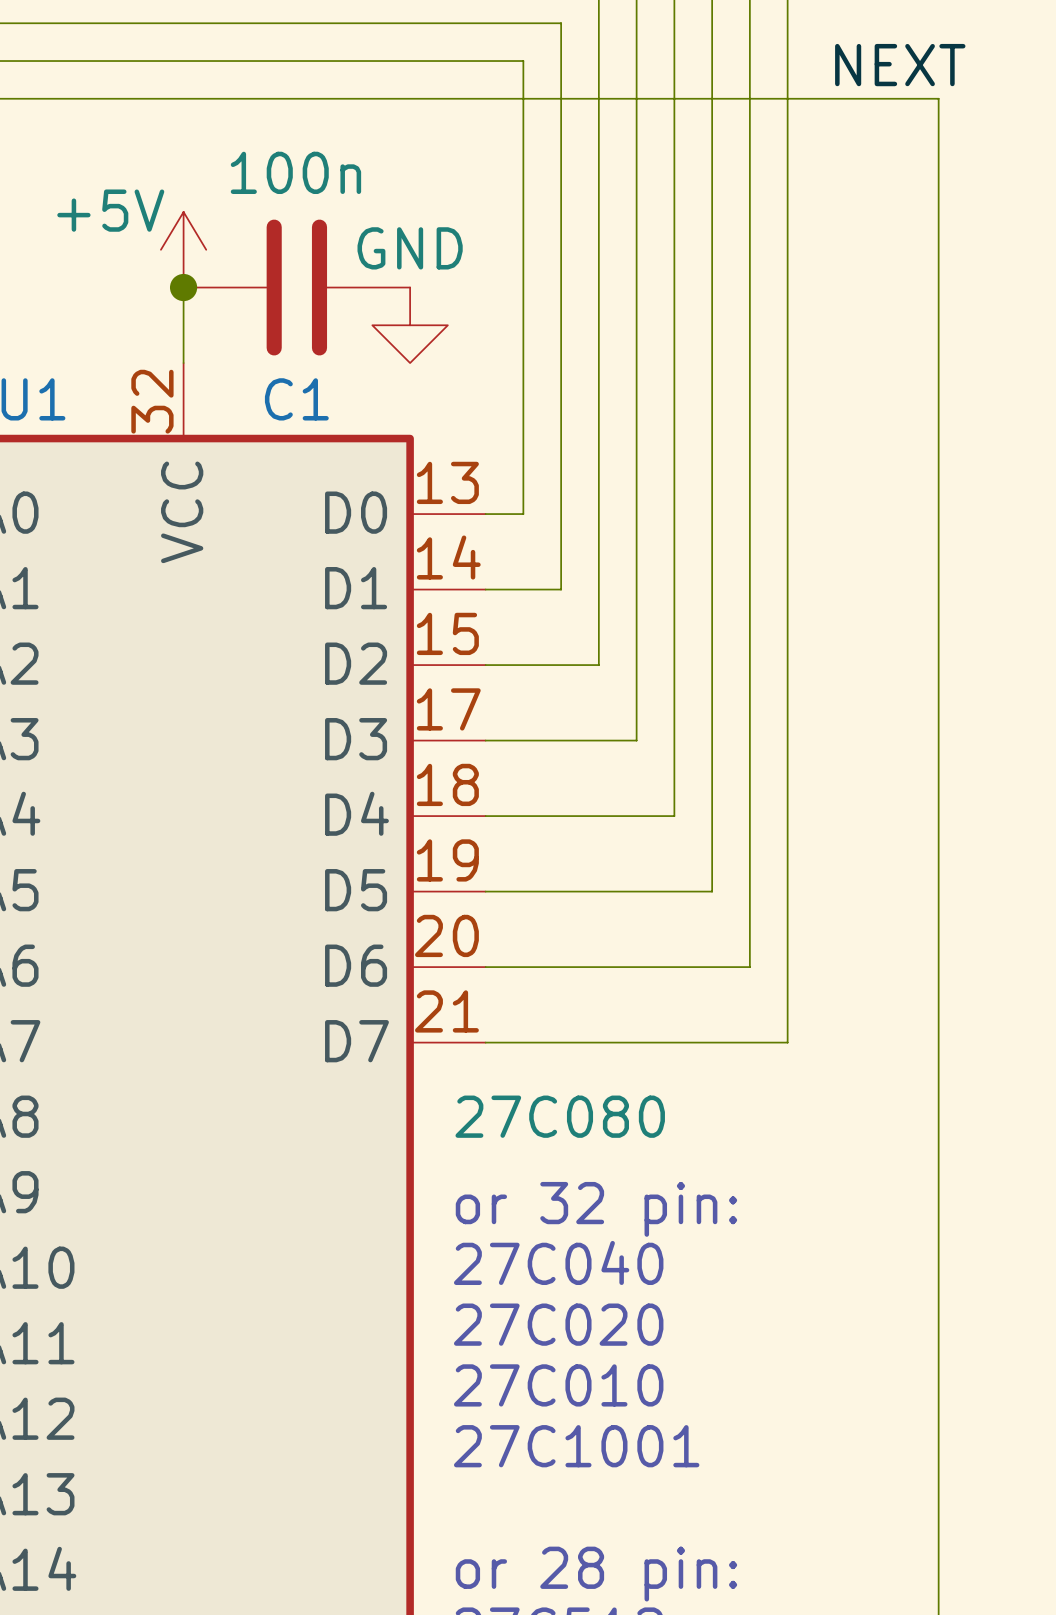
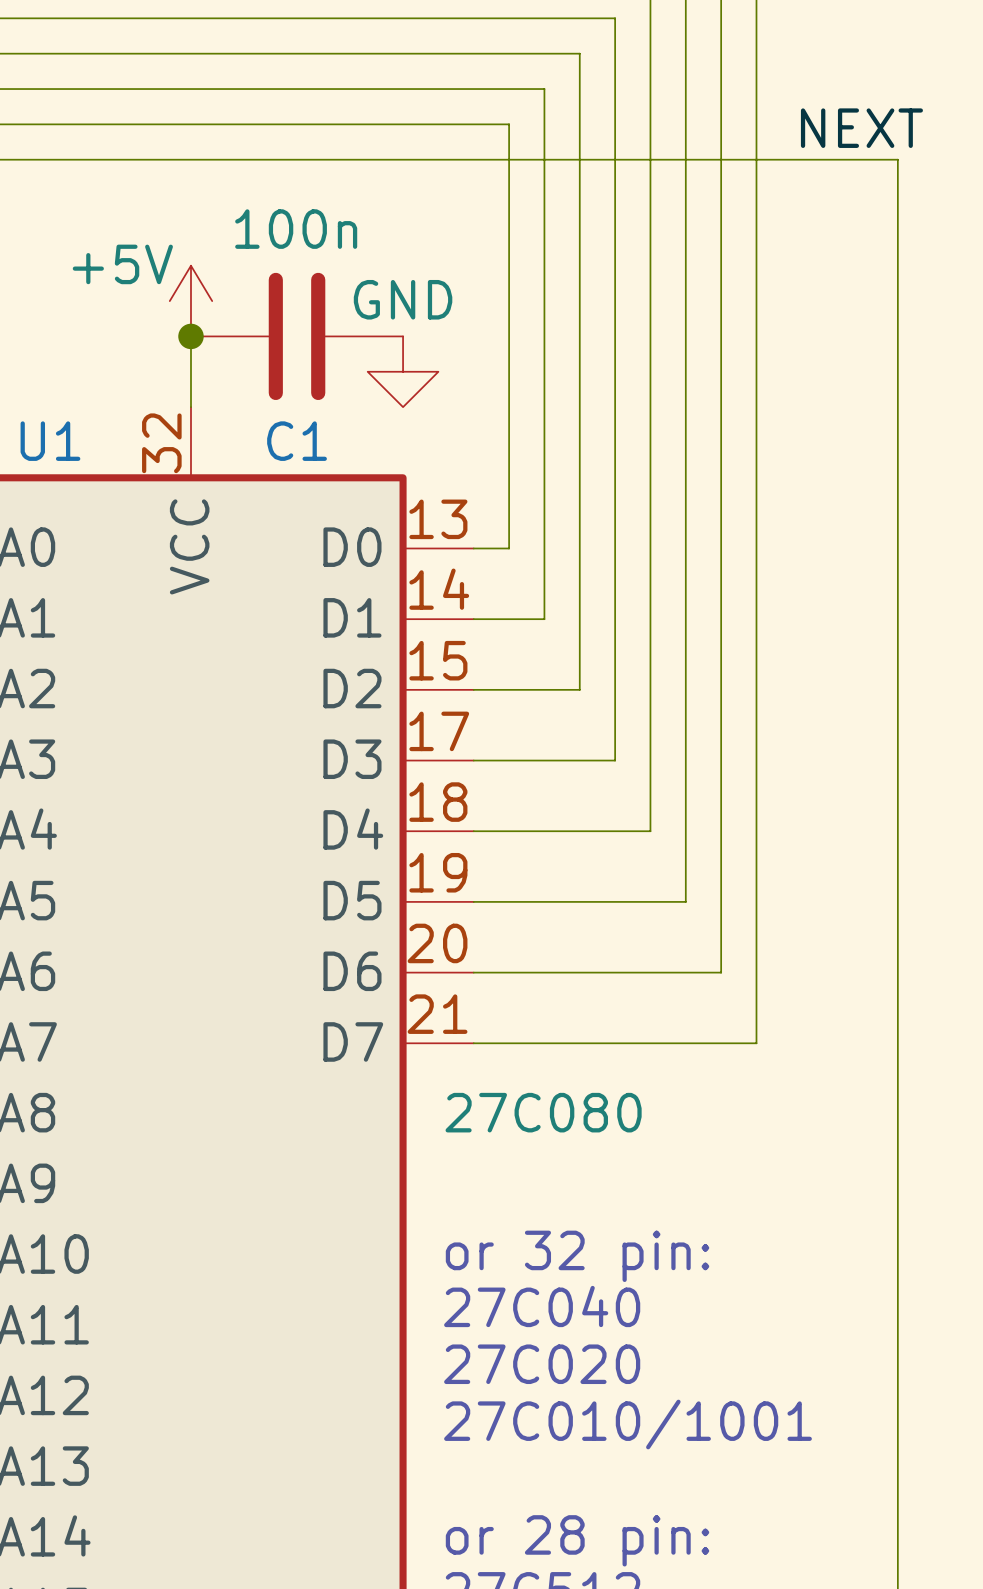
text: or 32 pin: (596, 1209) -> none
text: 27C040 (558, 1262) -> or 32 pin: (577, 1256)
text: 27C020 (558, 1324) -> 27C040 (542, 1306)
text: 27C010 (558, 1385) -> 27C020 (542, 1364)
text: 27C1001 (576, 1446) -> 27C010/1001 (628, 1424)

